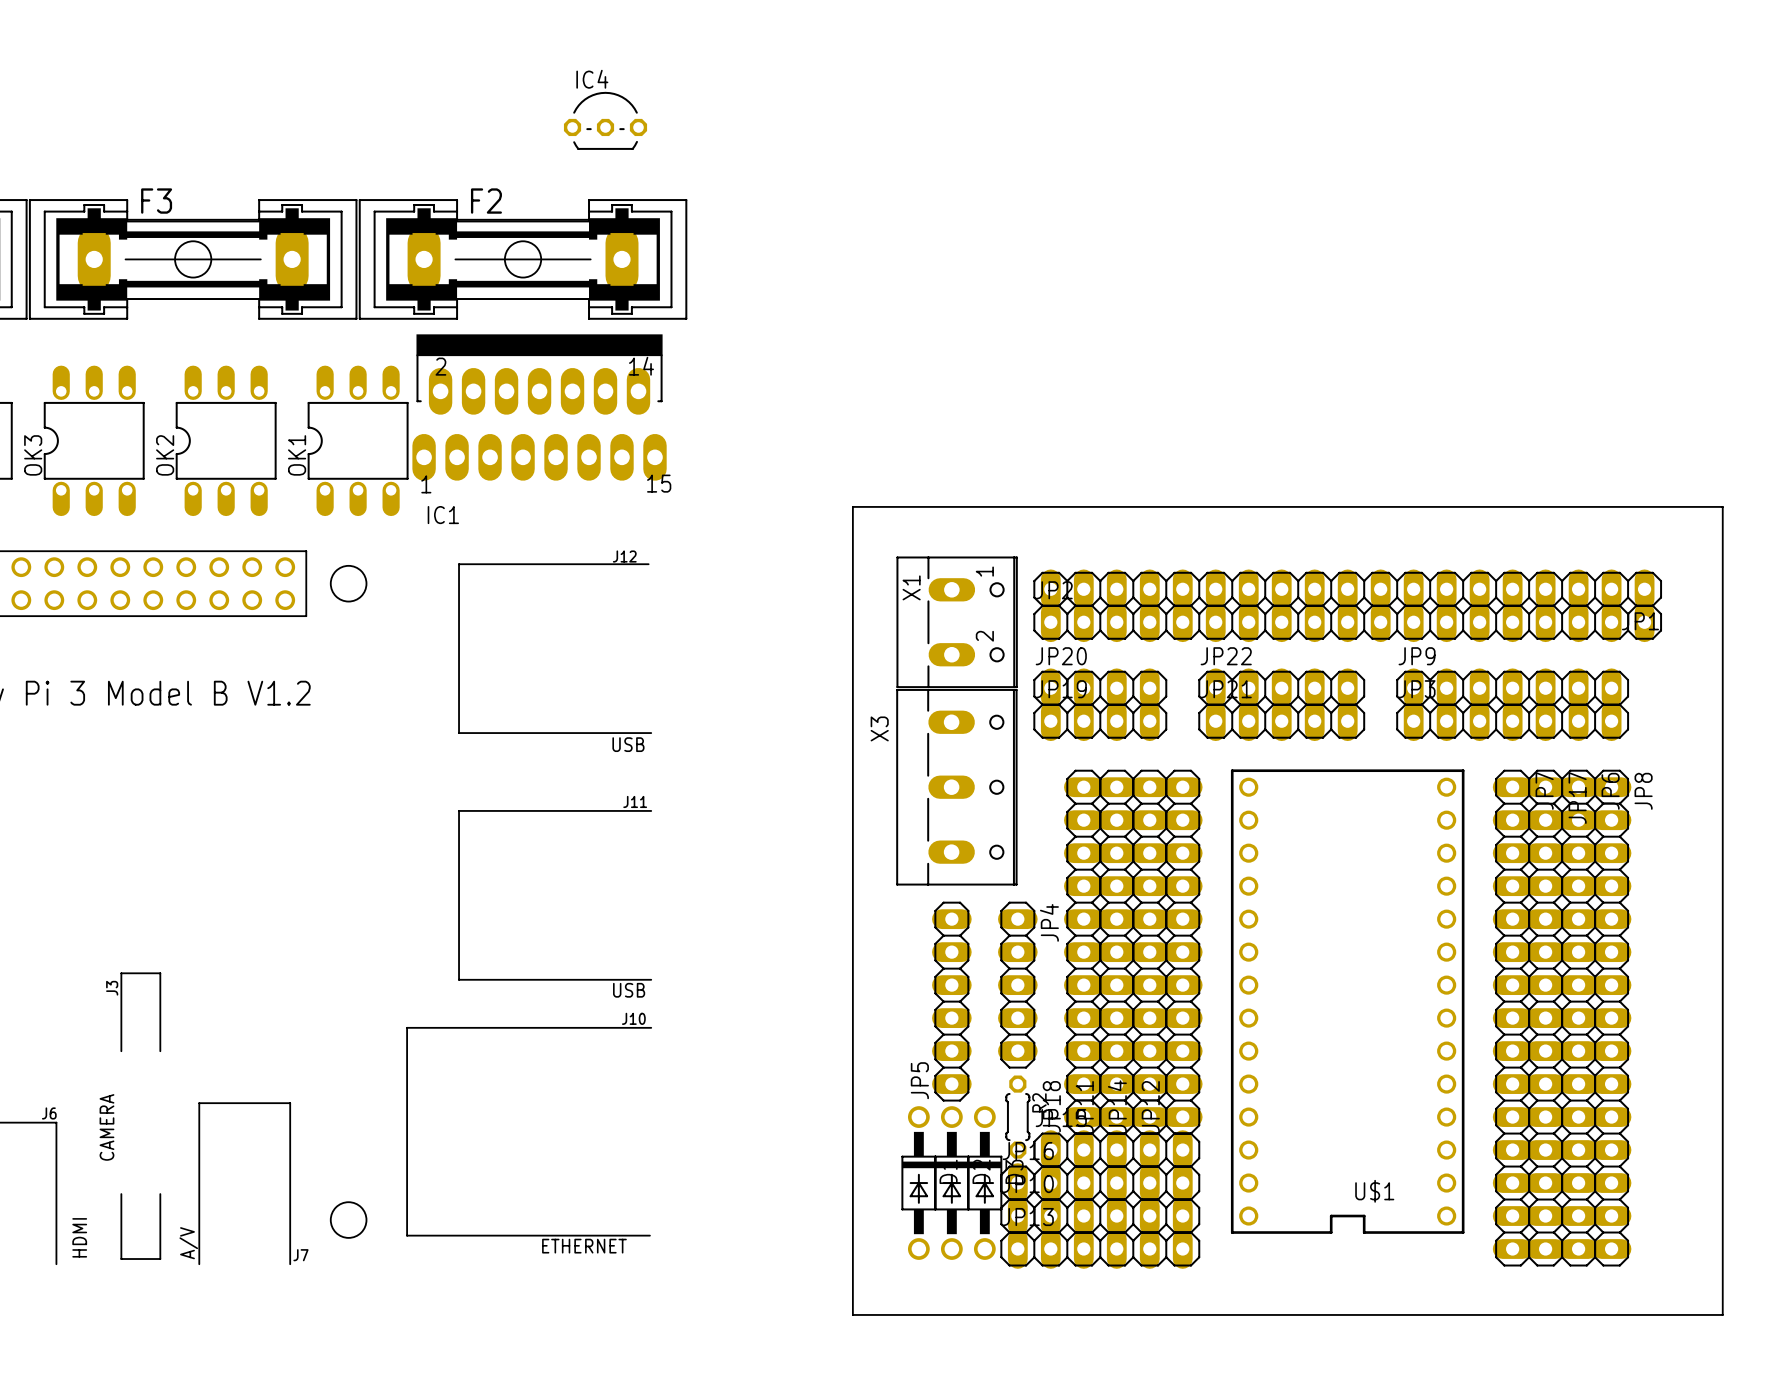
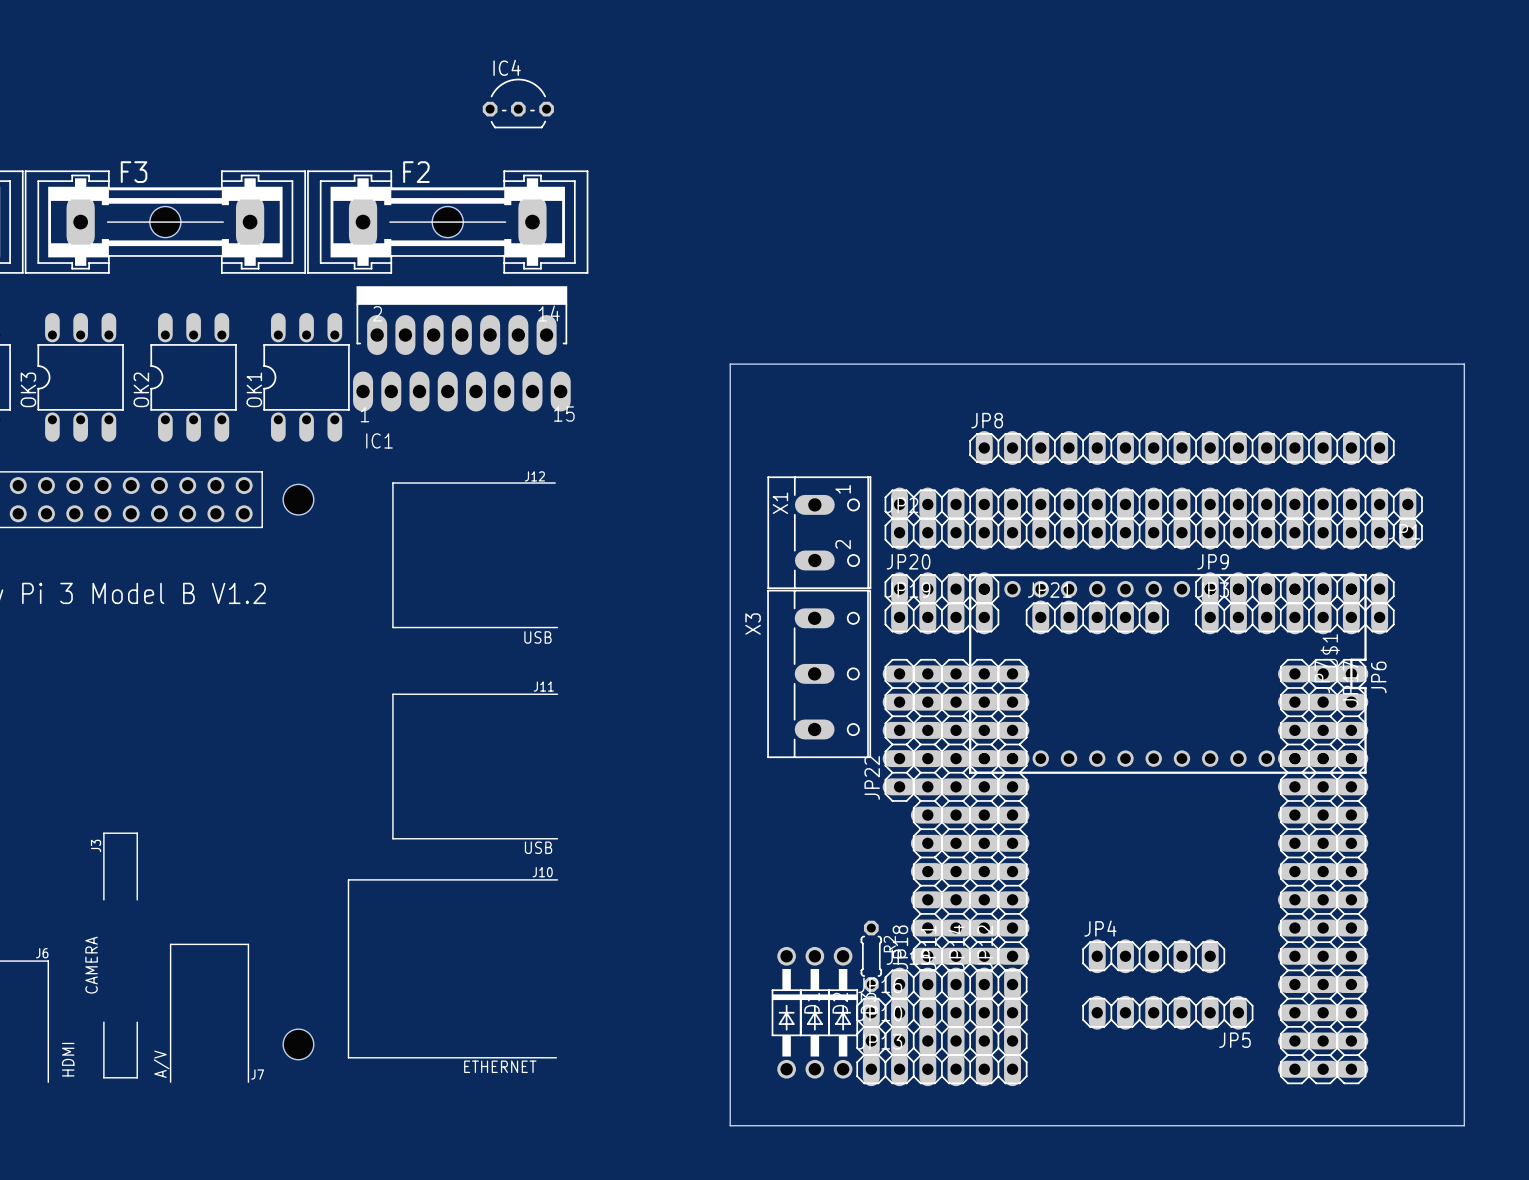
JP22 name position: JP22 (1226, 656) -> JP22 (872, 777)
JP22 rotation: 0° (1281, 688) -> 90° clockwise (899, 730)
JP22 position: (1281, 688) -> (899, 730)
JP8 name position: JP8 (1643, 791) -> JP8 (987, 420)
JP4 name position: JP4 (1049, 922) -> JP4 (1100, 928)
JP4 rotation: 0° (1017, 985) -> 90° clockwise (1153, 956)
JP4 position: (1017, 985) -> (1153, 956)
JP5 rotation: 0° (951, 1001) -> 90° clockwise (1167, 1012)
JP5 position: (951, 1001) -> (1167, 1012)
U$1 rotation: 0° (1347, 1001) -> 90° counterclockwise (1167, 673)
JP8 rotation: 0° (1611, 1018) -> 90° clockwise (1181, 447)
JP8 position: (1611, 1018) -> (1181, 447)
JP5 name position: JP5 (919, 1080) -> JP5 (1234, 1040)
board edge: (852, 1314) (852, 506) (1722, 506) (1722, 1314) (1710, 1314) -> (730, 1125) (730, 364) (1464, 364) (1464, 1125)

